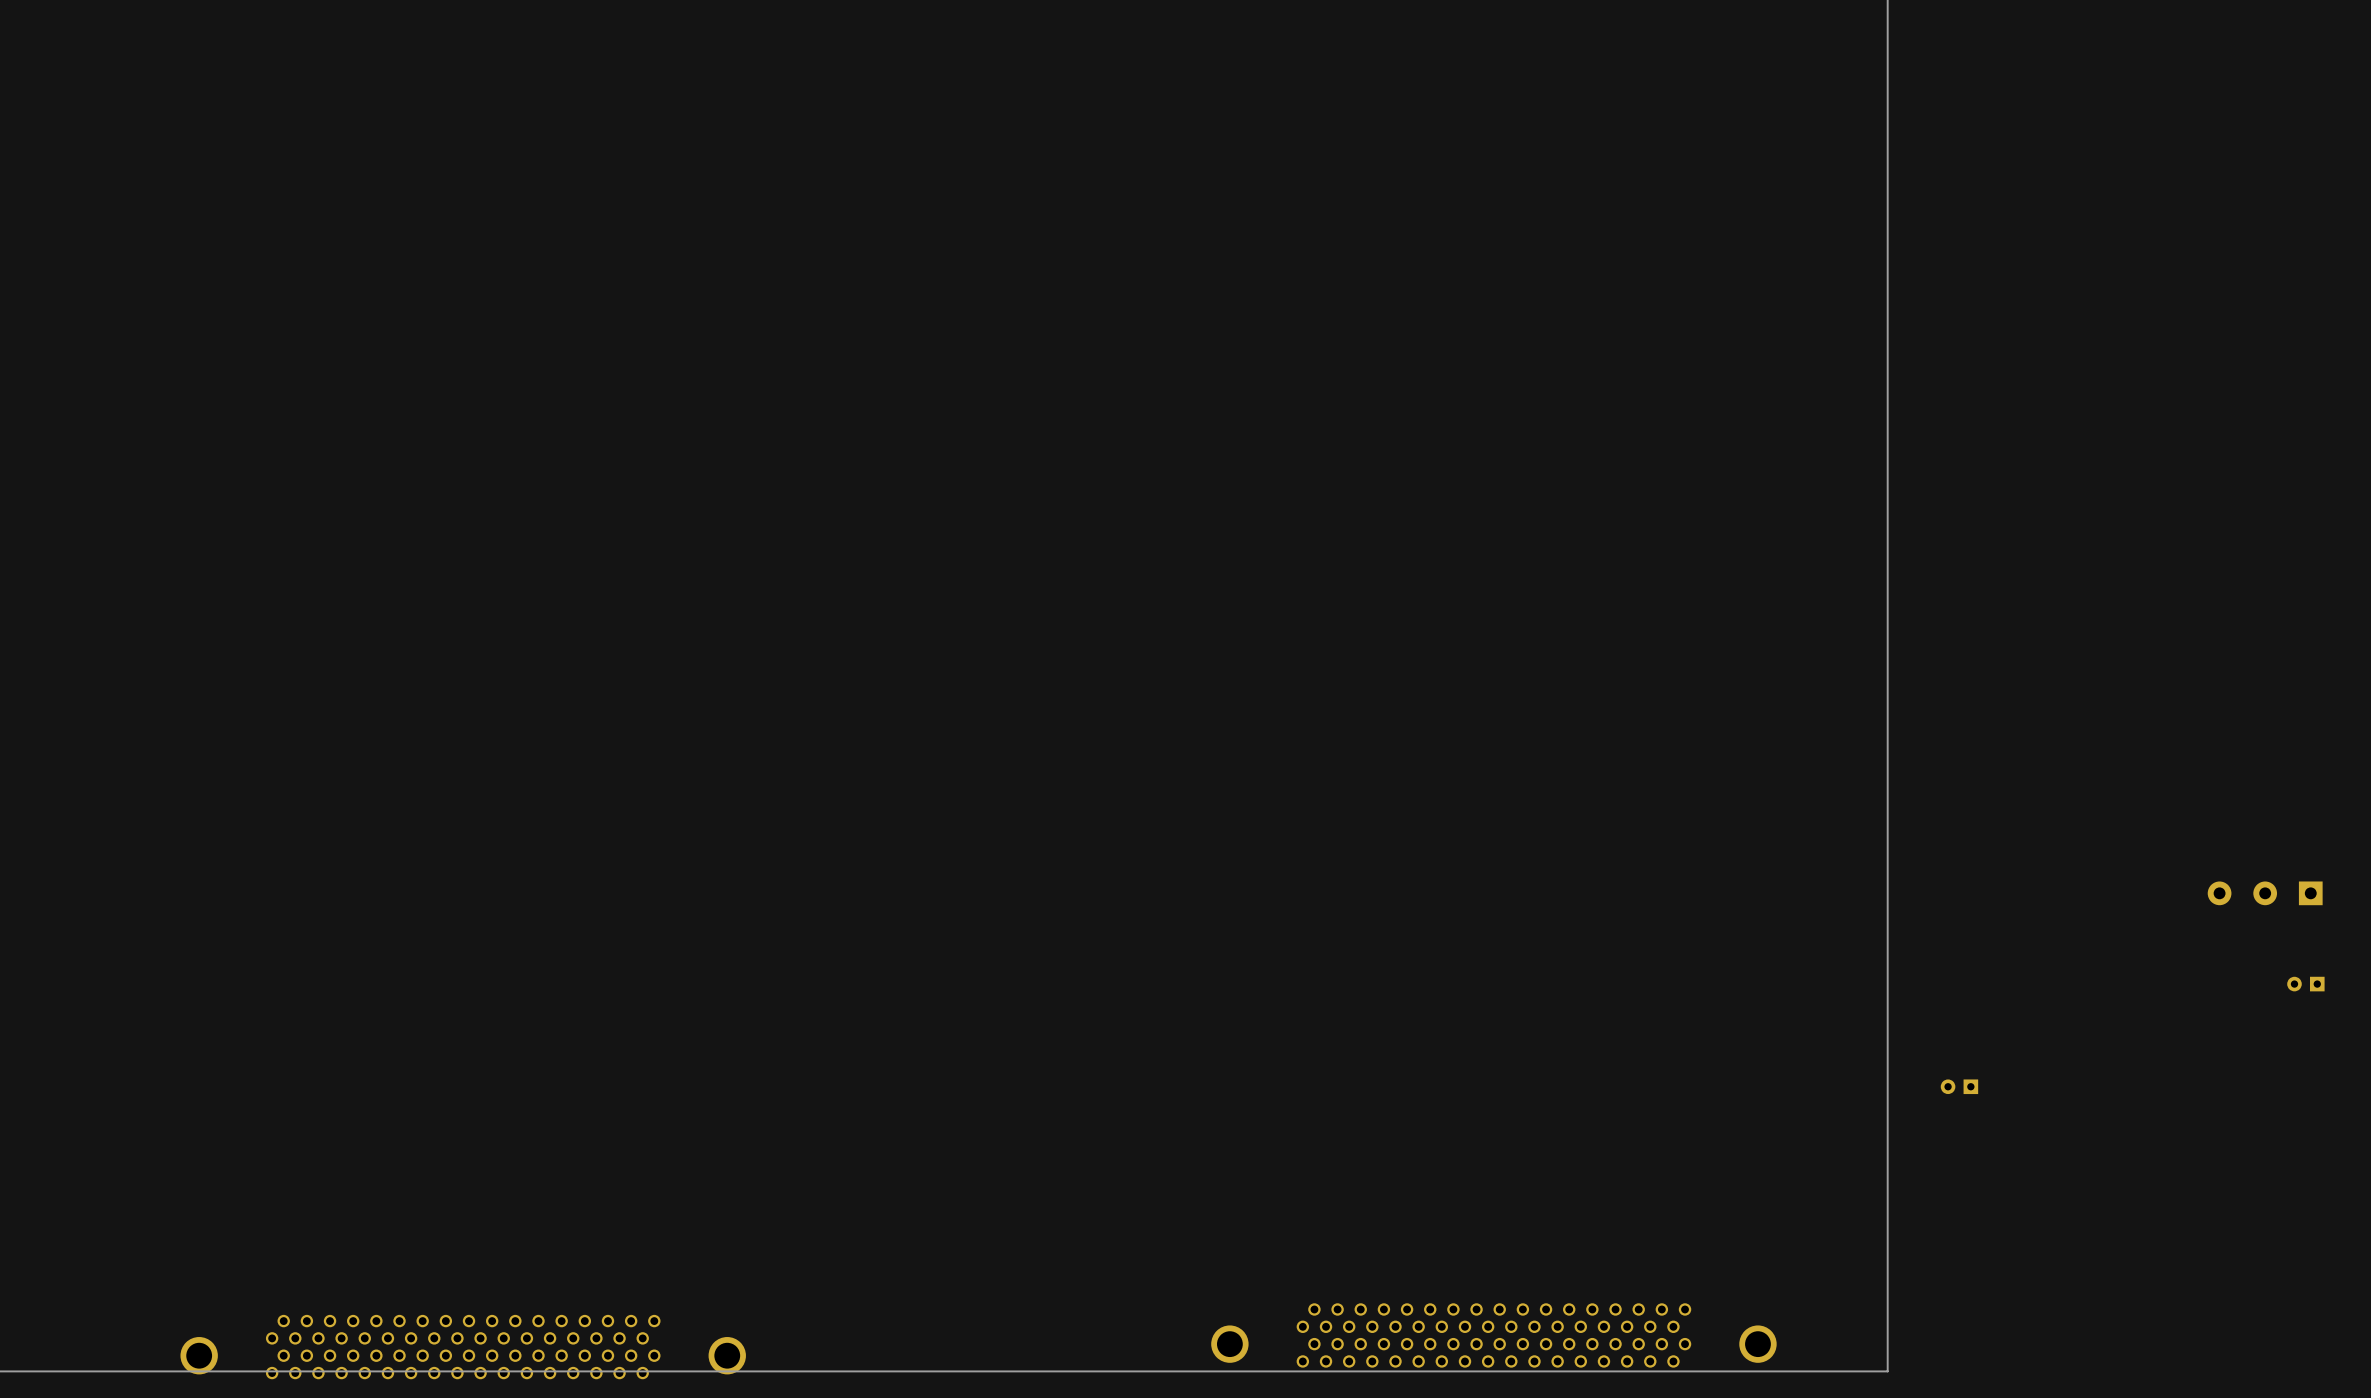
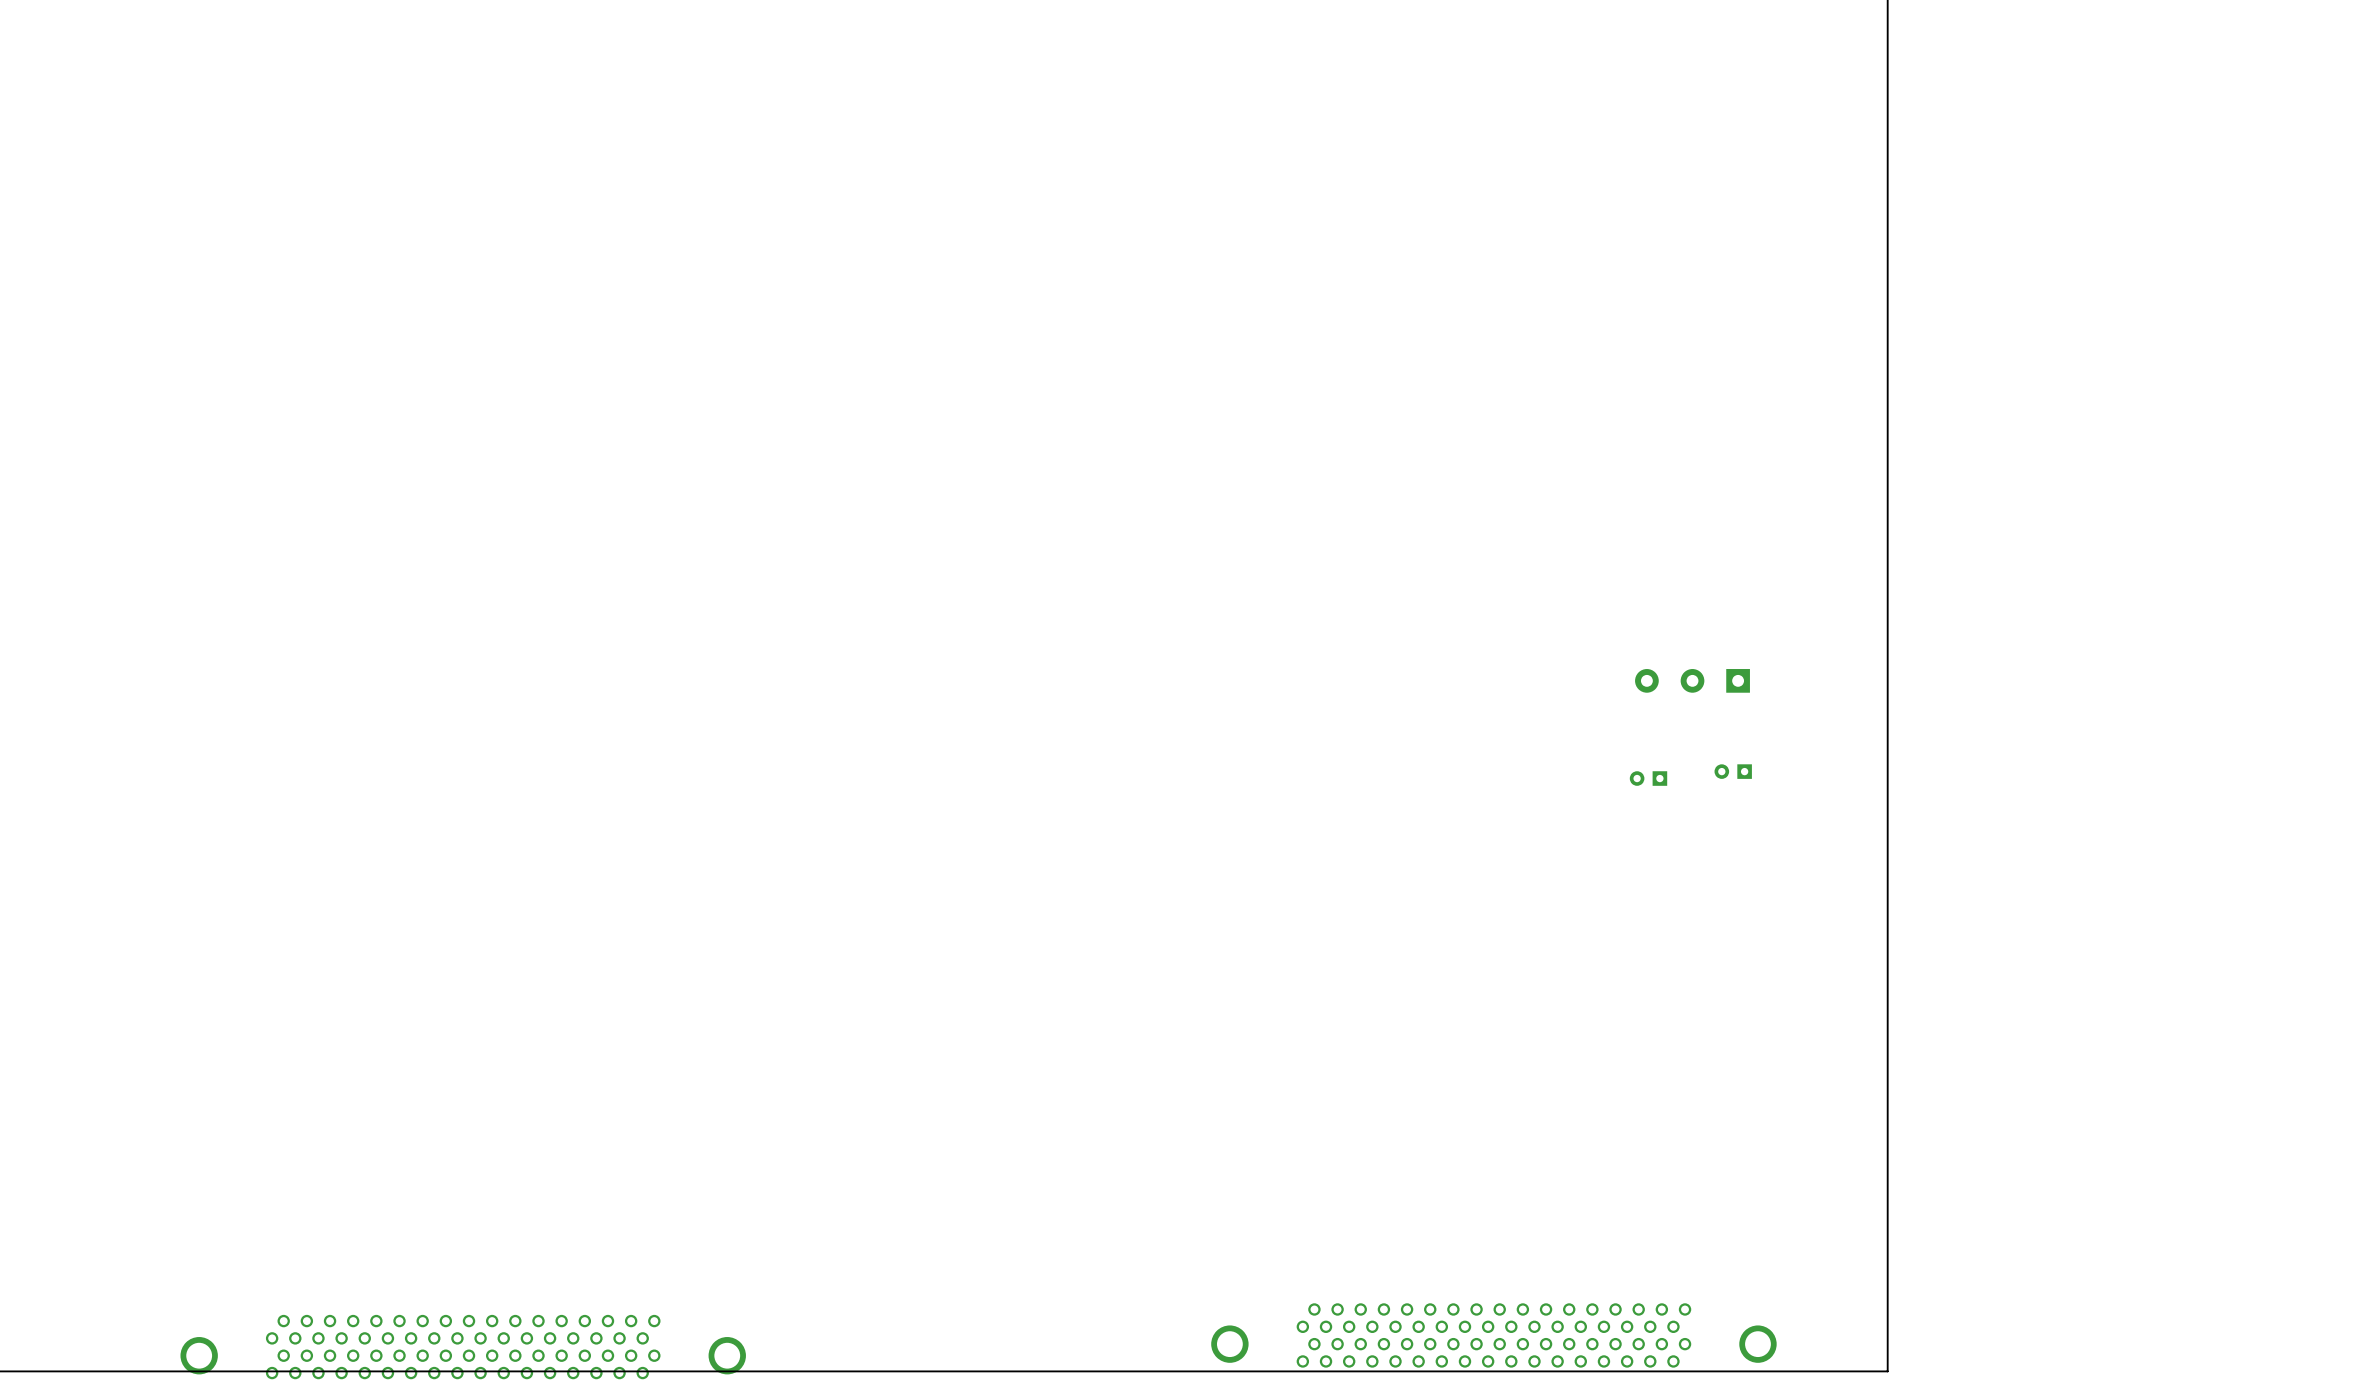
part: none -> (1692, 680)
part: none -> (1733, 771)
part: none -> (1648, 778)
part: (2265, 893) -> none
part: (2305, 984) -> none
part: (1959, 1086) -> none

